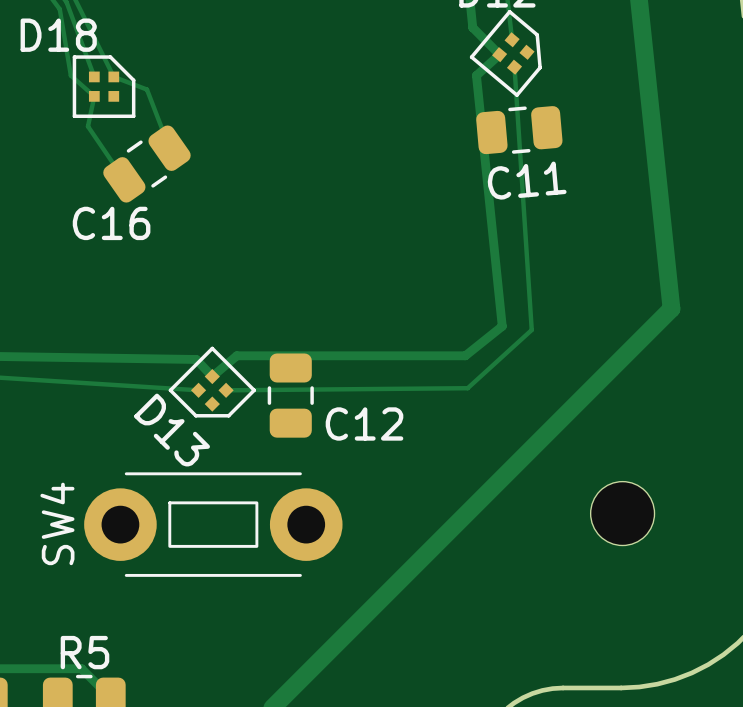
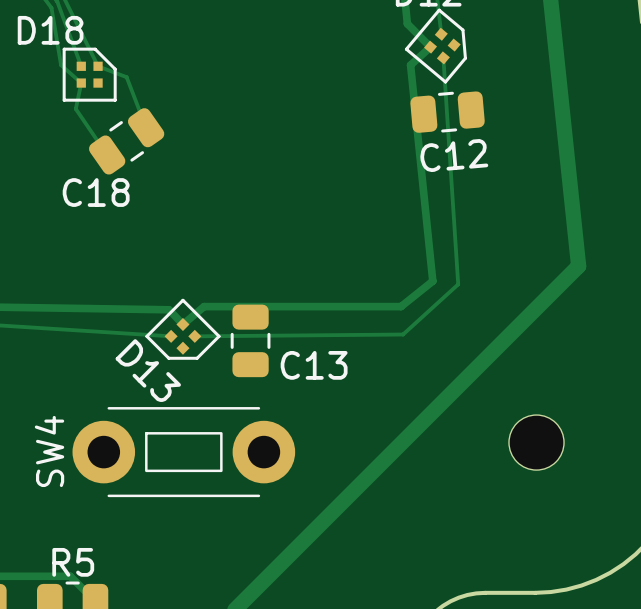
C11 name: C11 (527, 180) -> C12 (454, 155)
C16 name: C16 (111, 223) -> C18 (96, 192)
C12 name: C12 (364, 423) -> C13 (314, 365)

